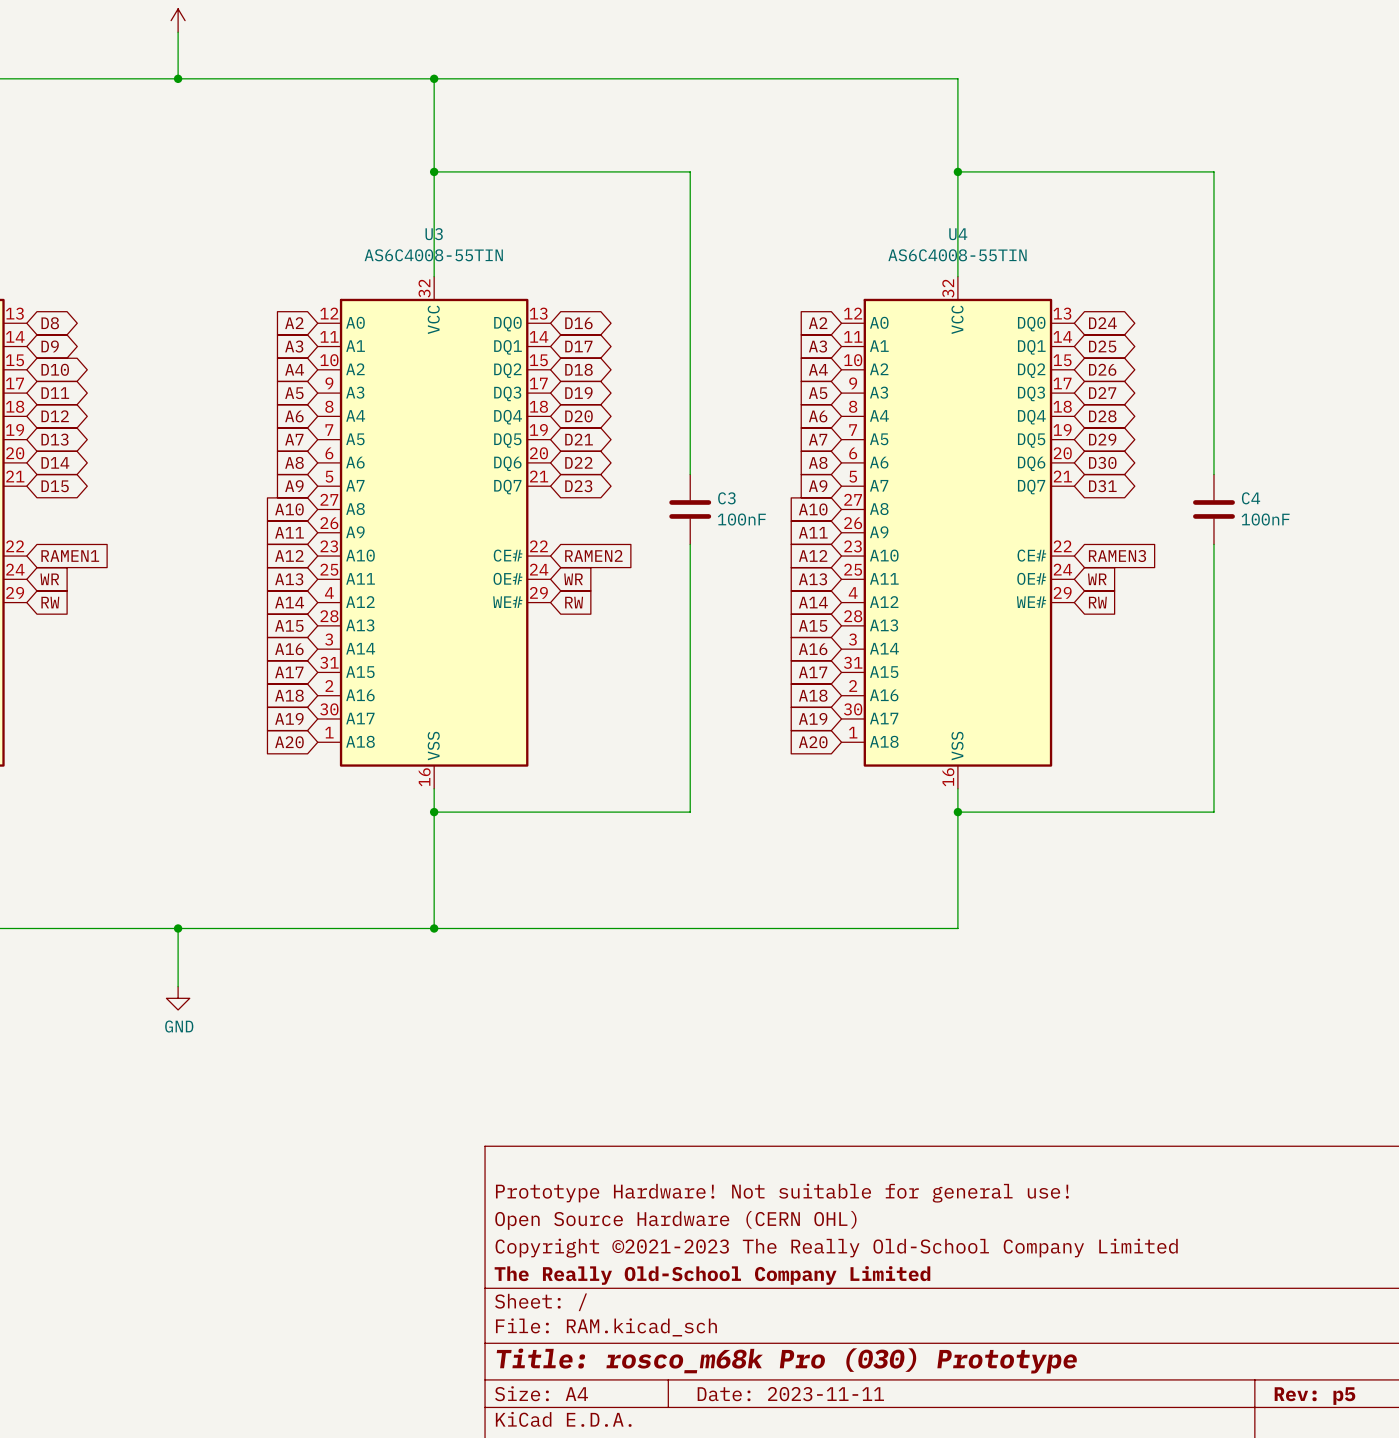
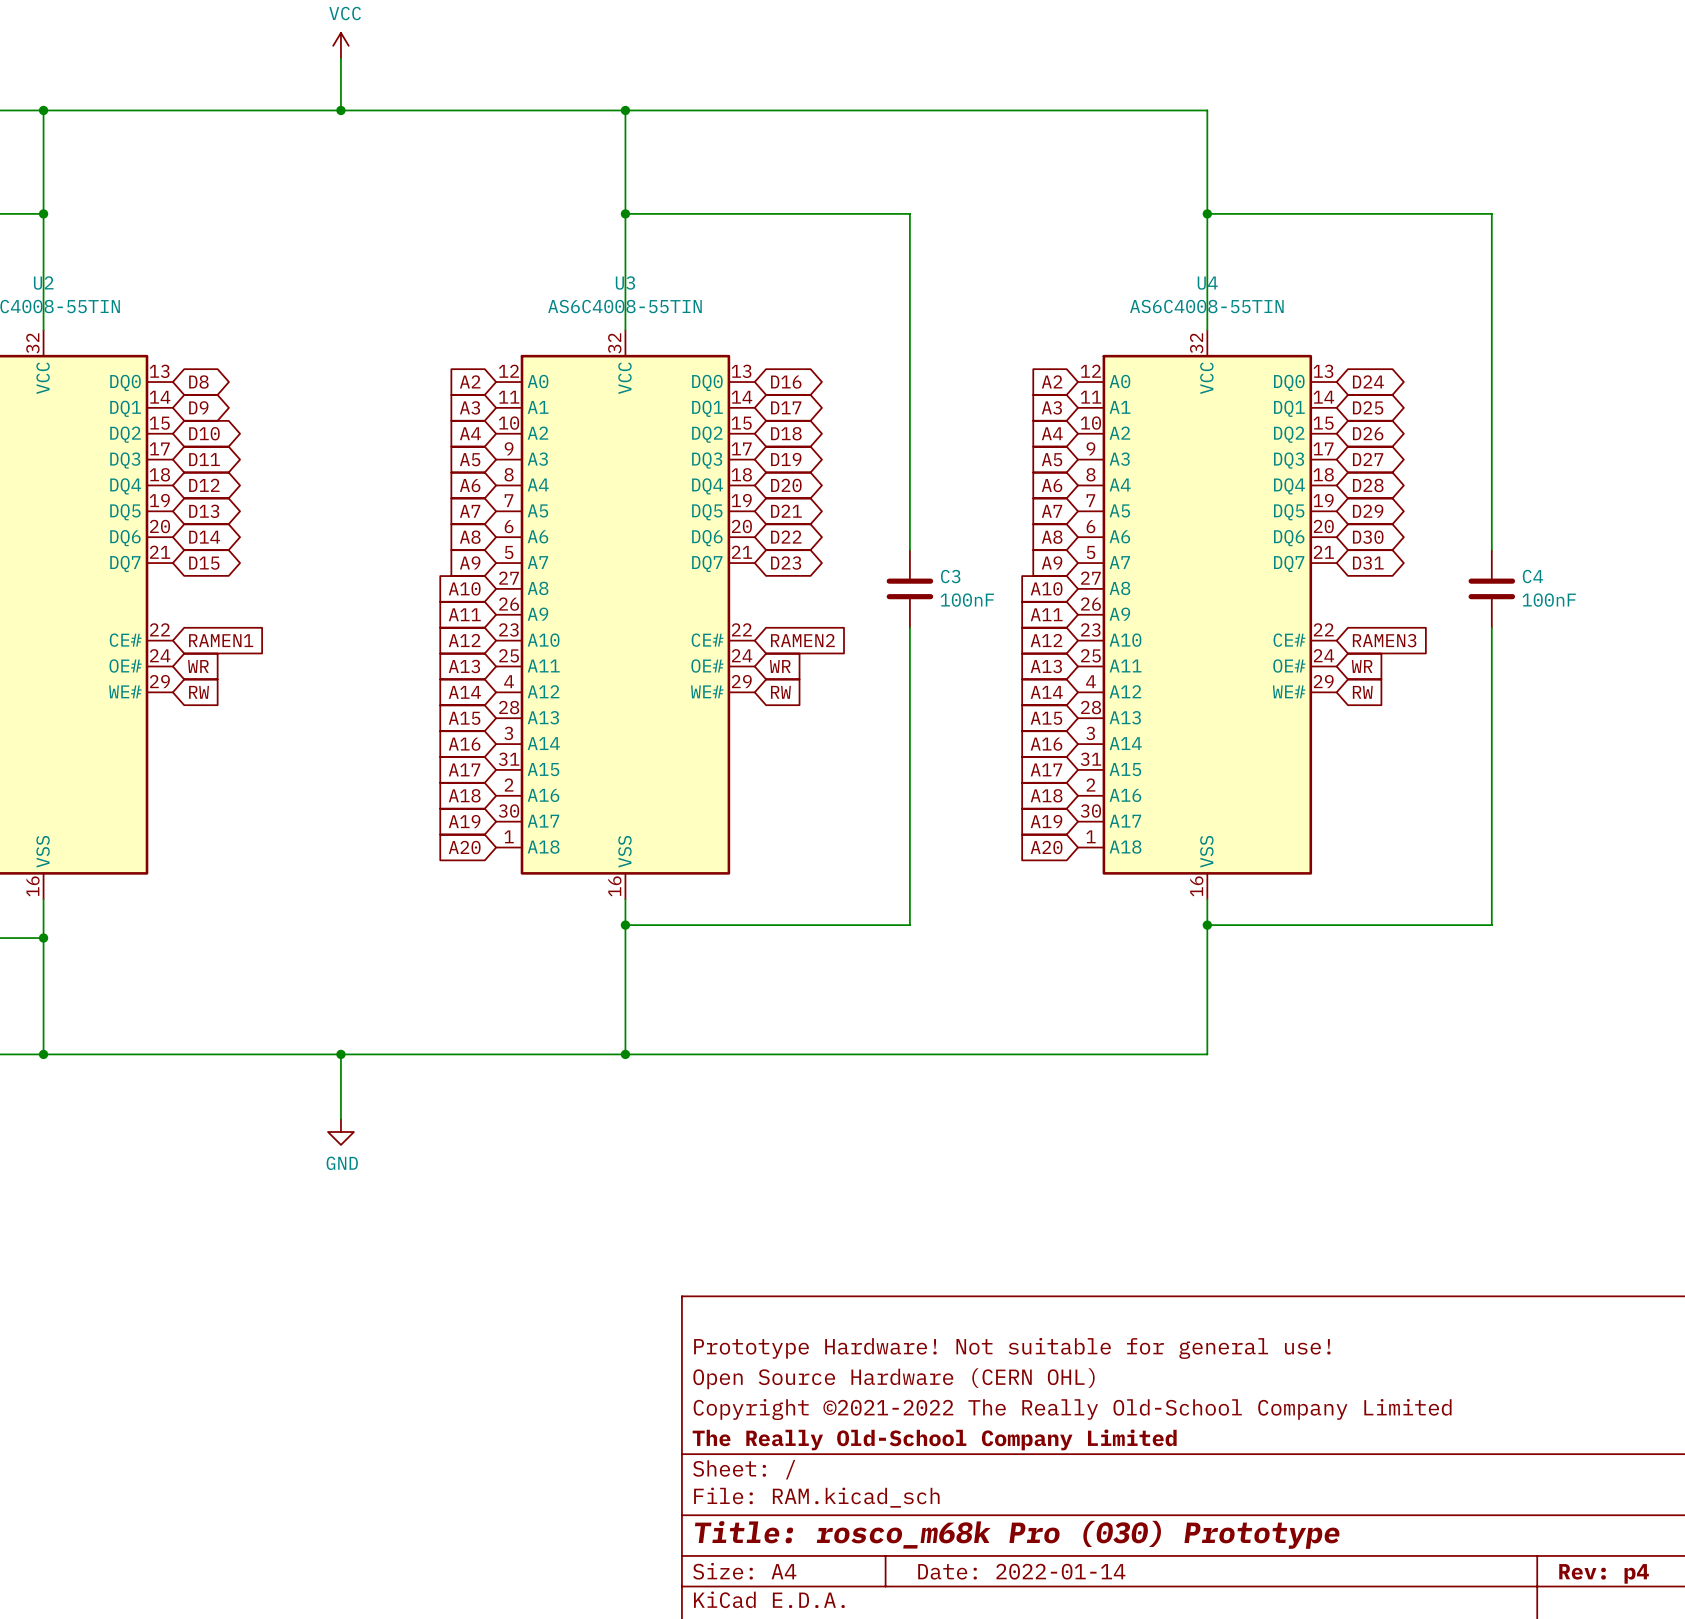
title block: Copyright ©2021-2023 The Really Old-School Company Limited (836, 1248) -> Copyright ©2021-2022 The Really Old-School Company Limited (1072, 1409)
title block: Date: 2023-11-11 (790, 1394) -> Date: 2022-01-14 (1021, 1571)
title block: Rev: p5 (1314, 1396) -> Rev: p4 (1604, 1573)

